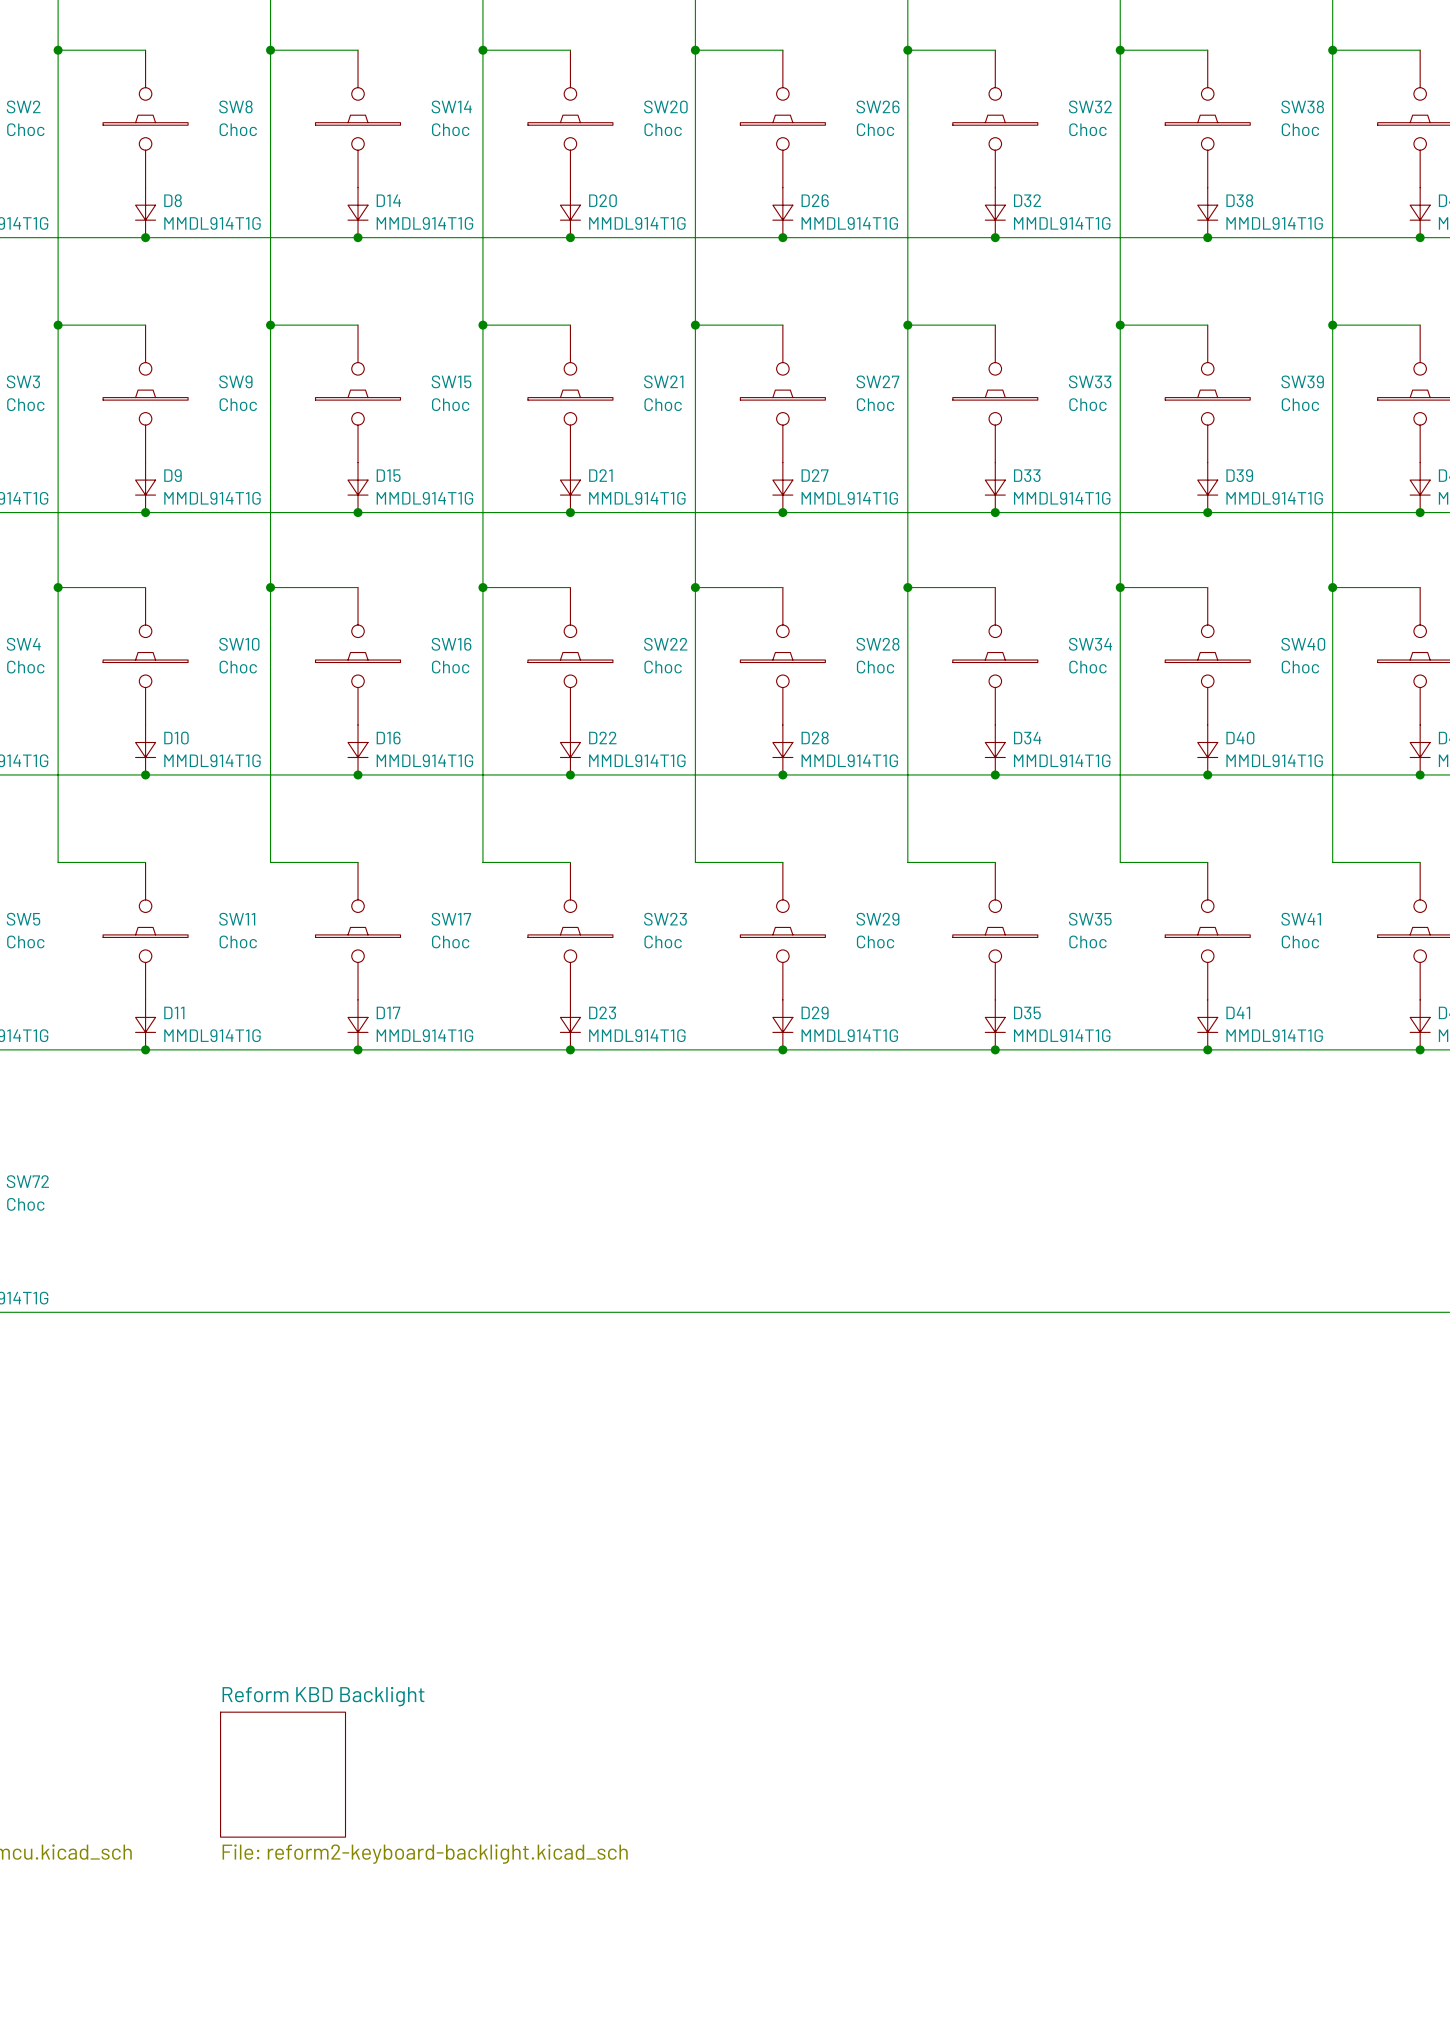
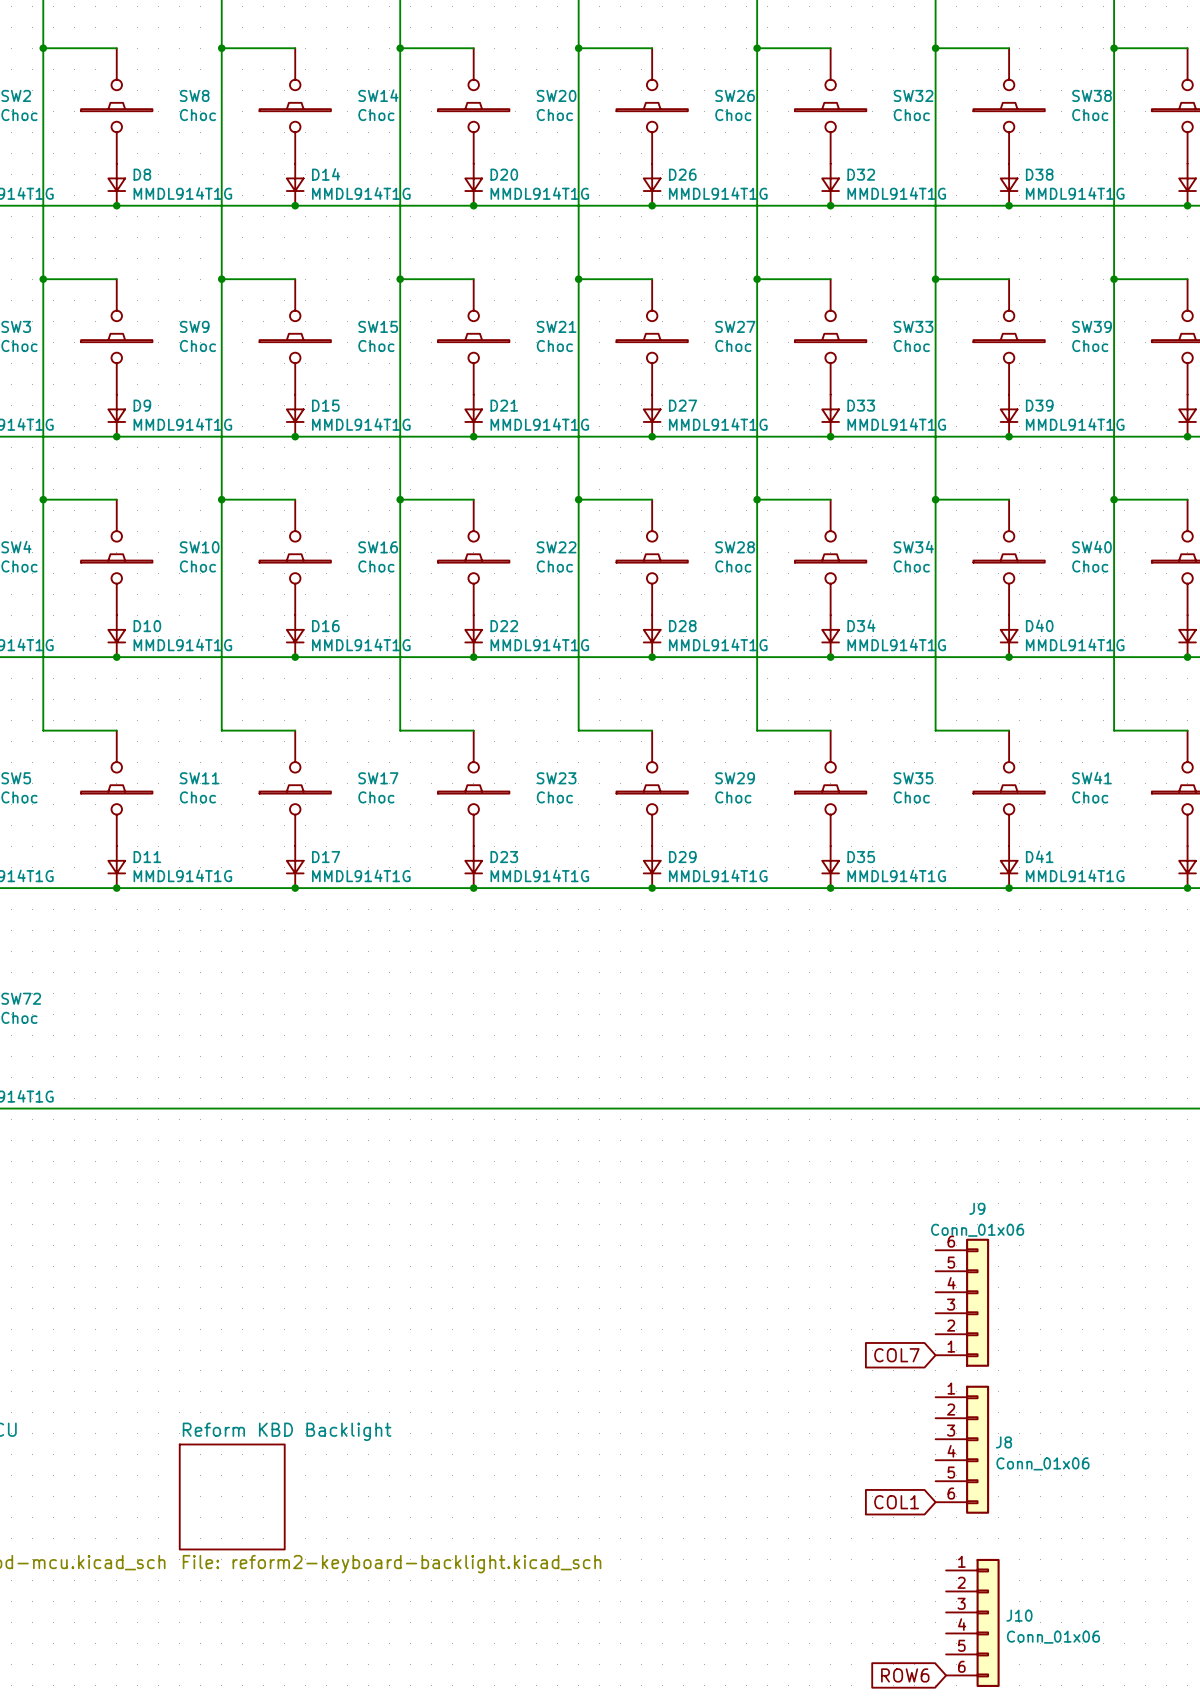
J9: none -> Conn_01x06 (962, 1302)
global label: none -> COL7 (896, 1355)
J8: none -> Conn_01x06 (962, 1449)
global label: none -> COL1 (896, 1502)
J10: none -> Conn_01x06 (972, 1622)
global label: none -> ROW6 (905, 1675)

